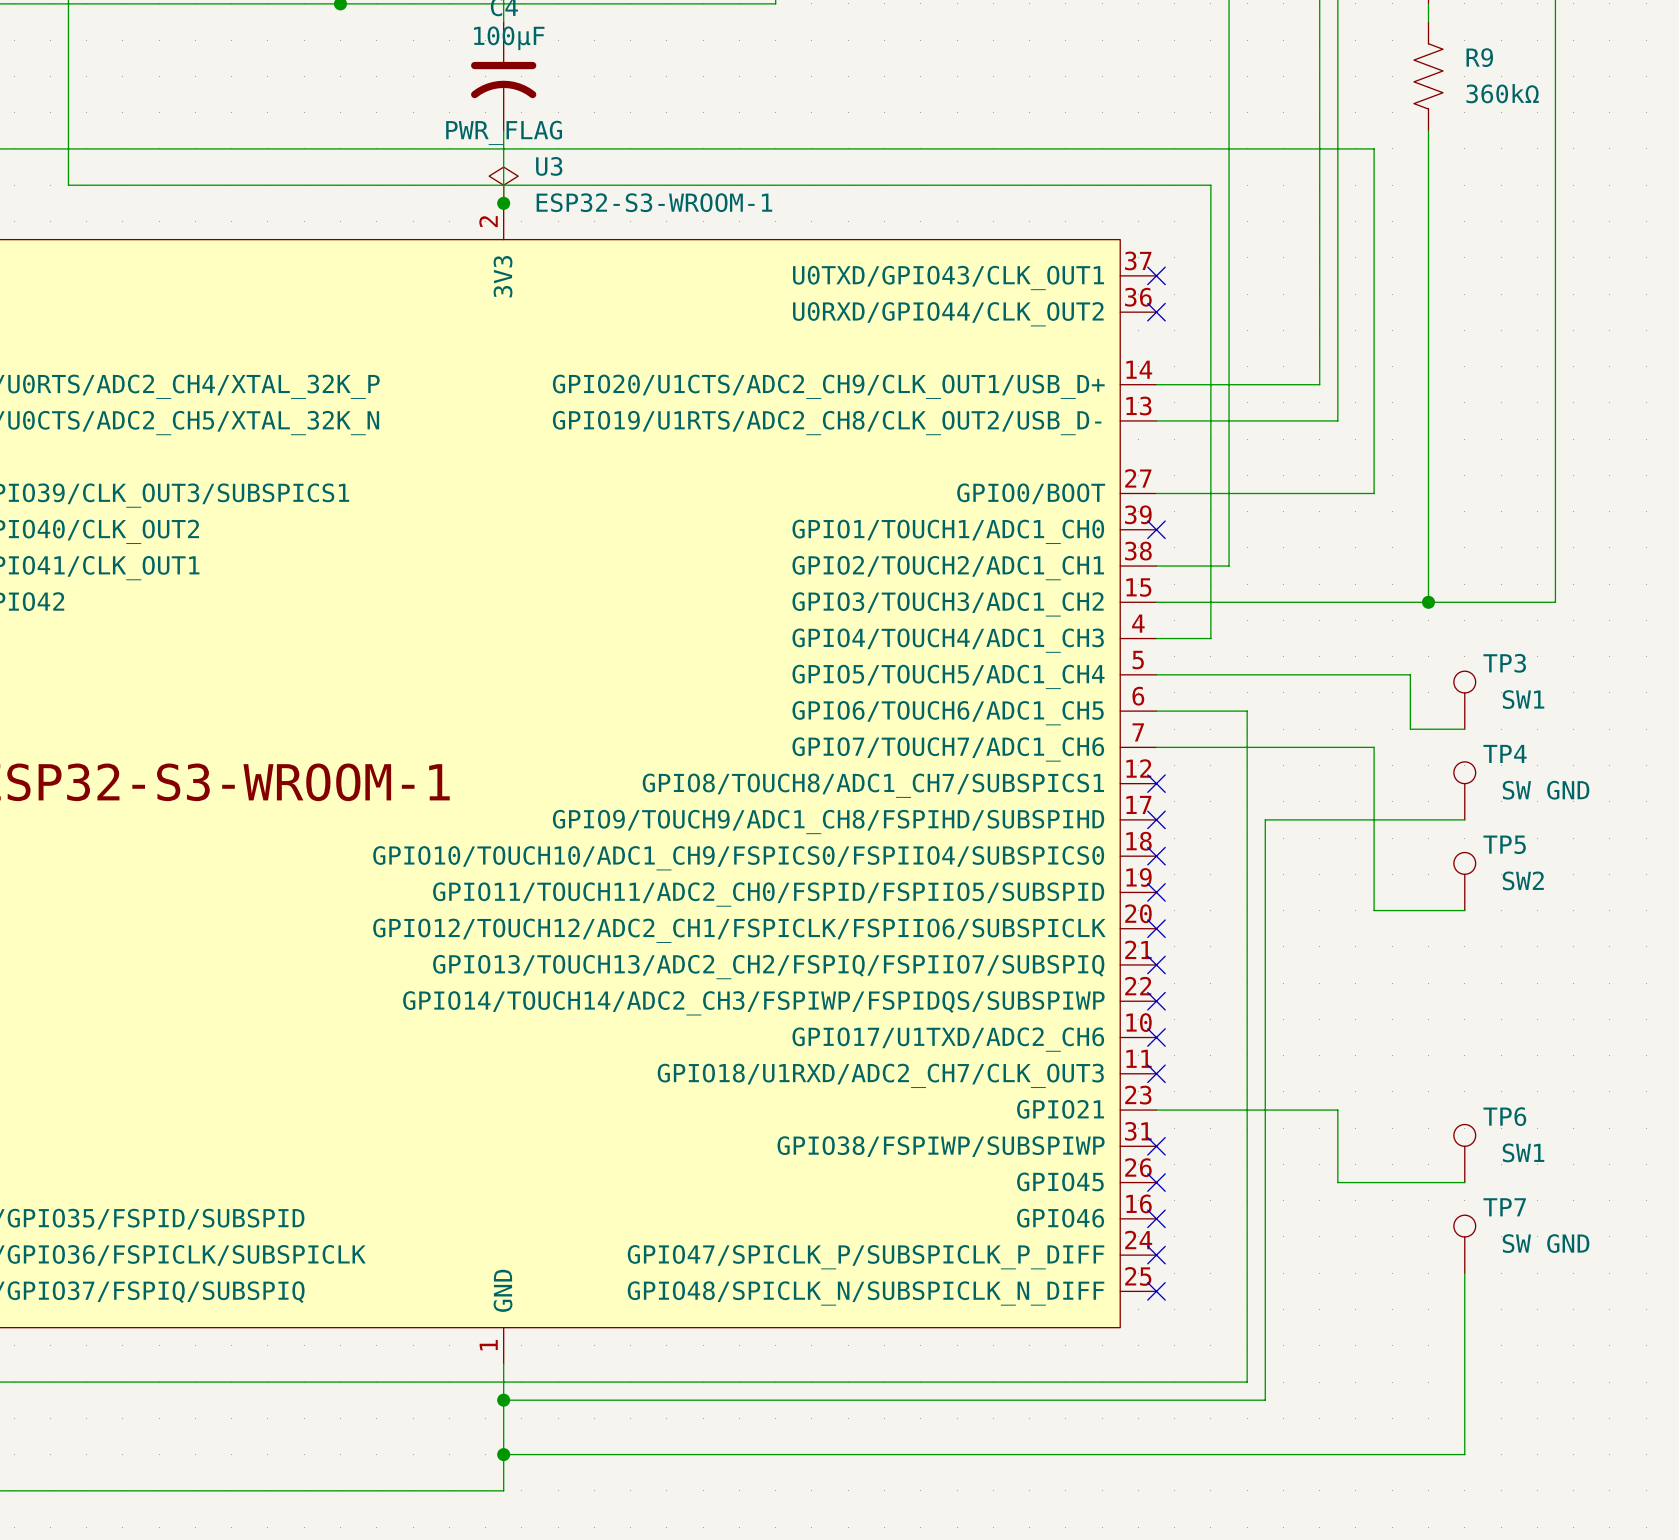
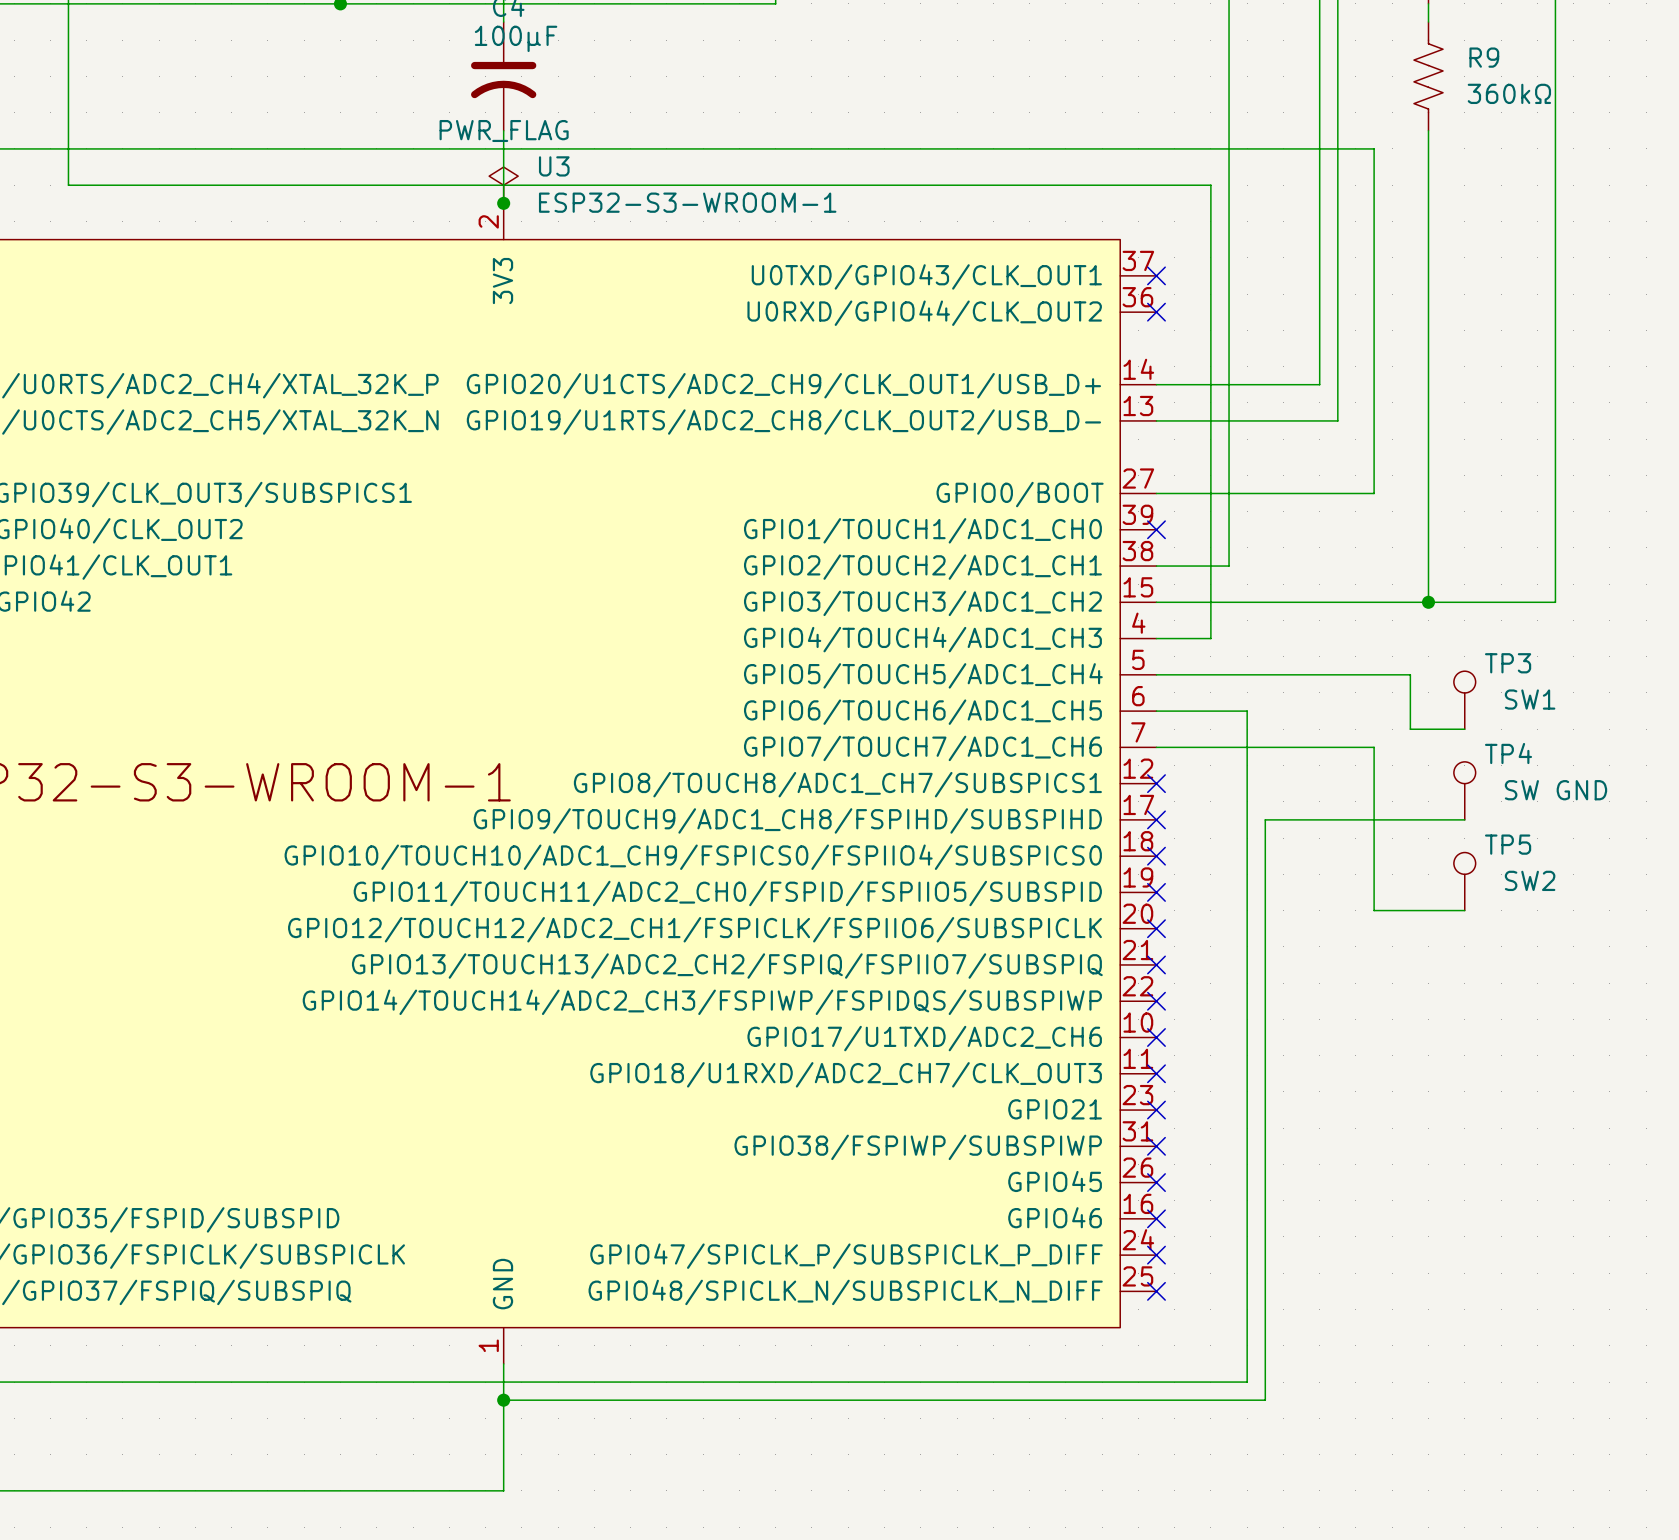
wire: (1156, 1110) (1337, 1110) (1337, 1182) (1464, 1182) -> none
no-connect mark: none -> (1156, 1110)
TP6: SW1 (1464, 1153) -> none
TP7: SW GND (1464, 1244) -> none
wire: (1464, 1273) (1464, 1454) (503, 1454) -> none
junction: (503, 1454) -> none

